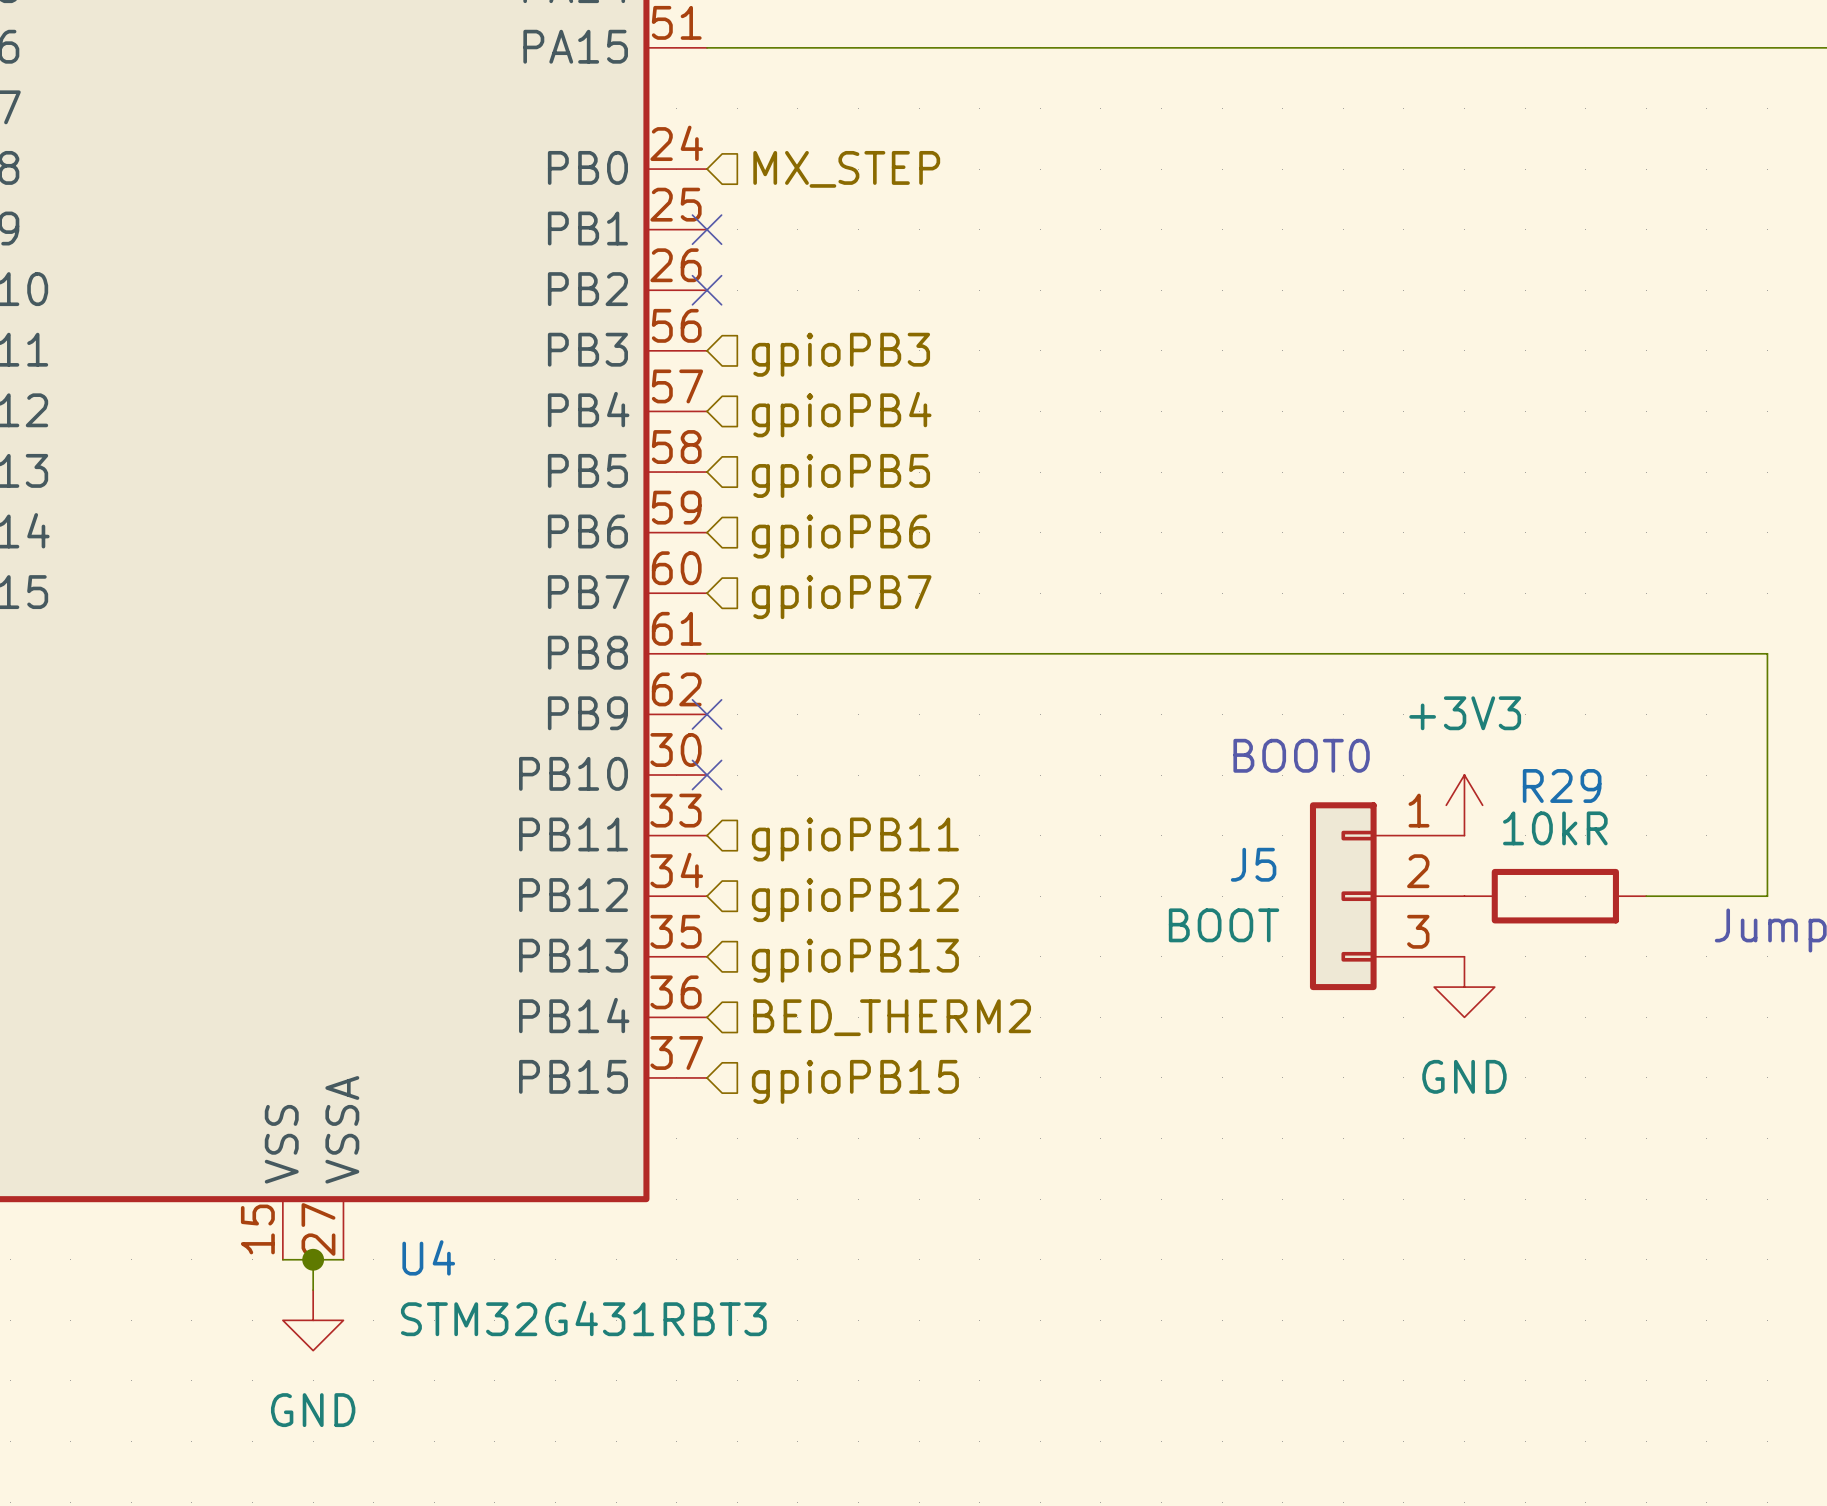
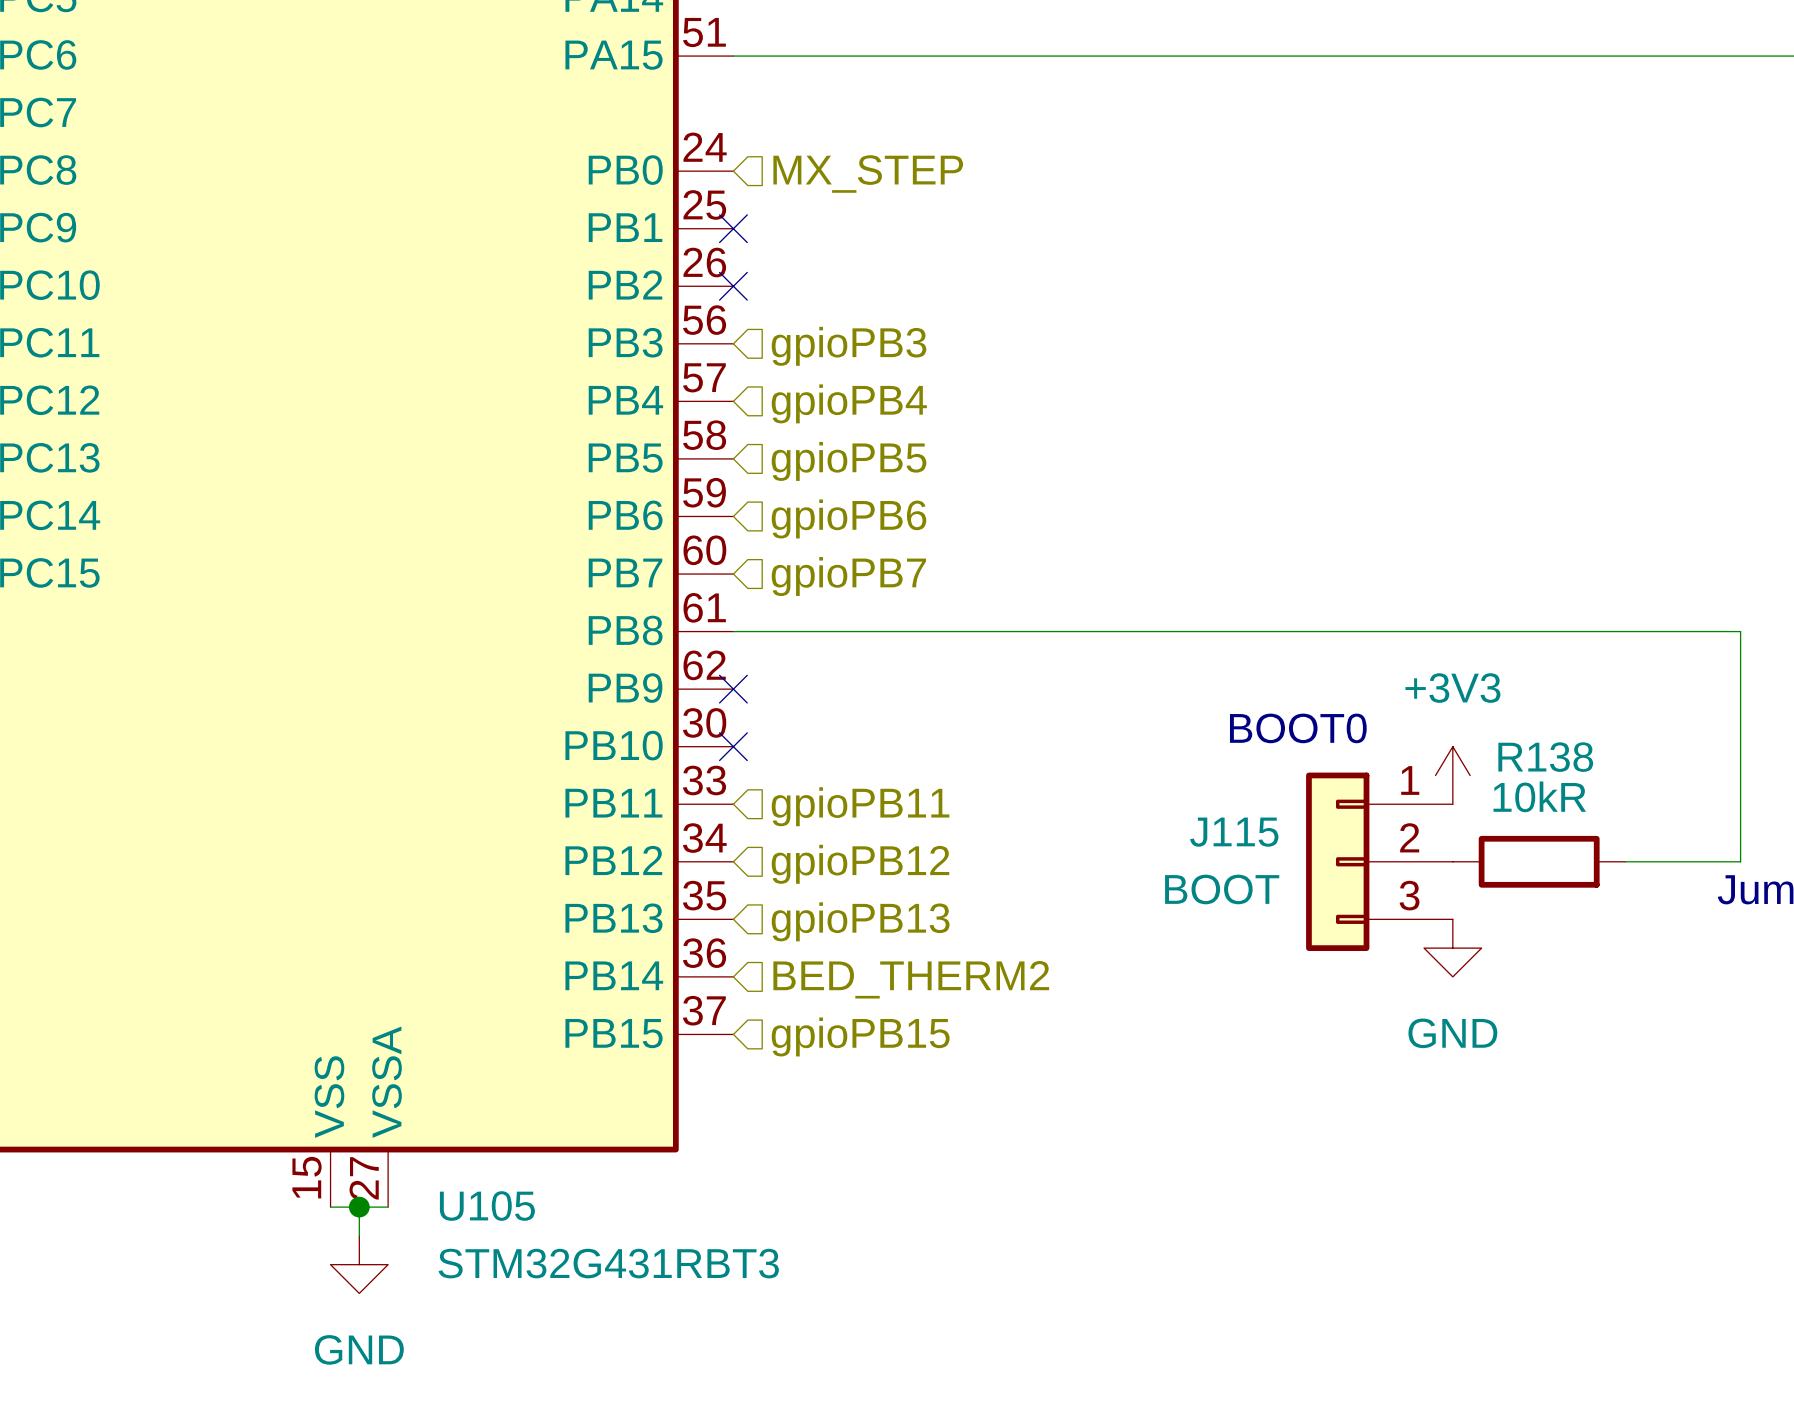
R29 name: R29 (1562, 785) -> R138 (1545, 757)
J5 name: J5 (1253, 864) -> J115 (1234, 832)
U4 name: U4 (428, 1257) -> U105 (487, 1206)

